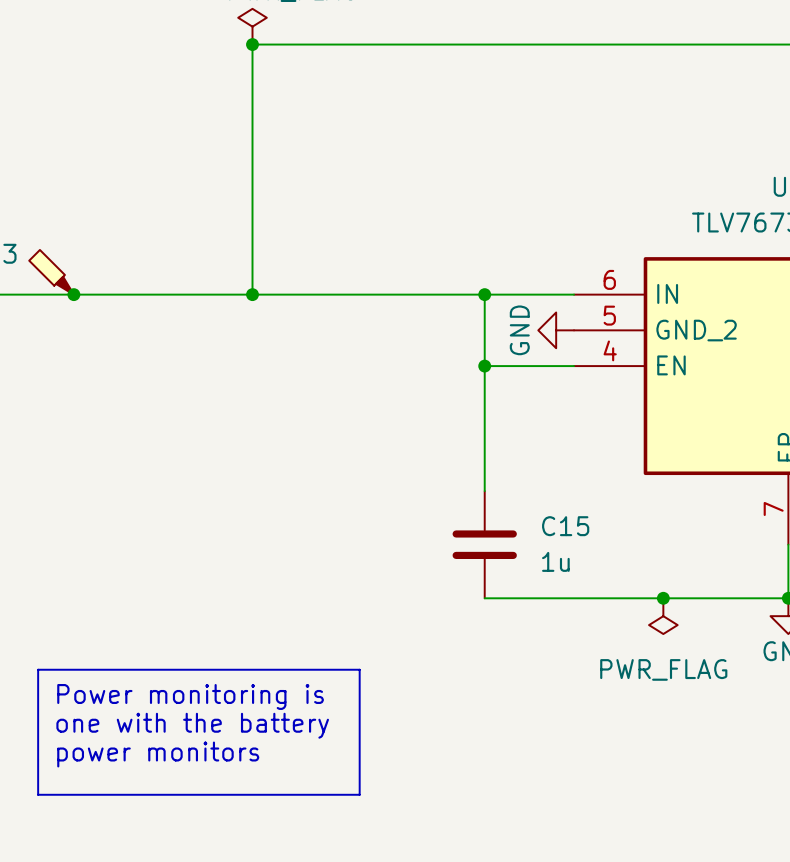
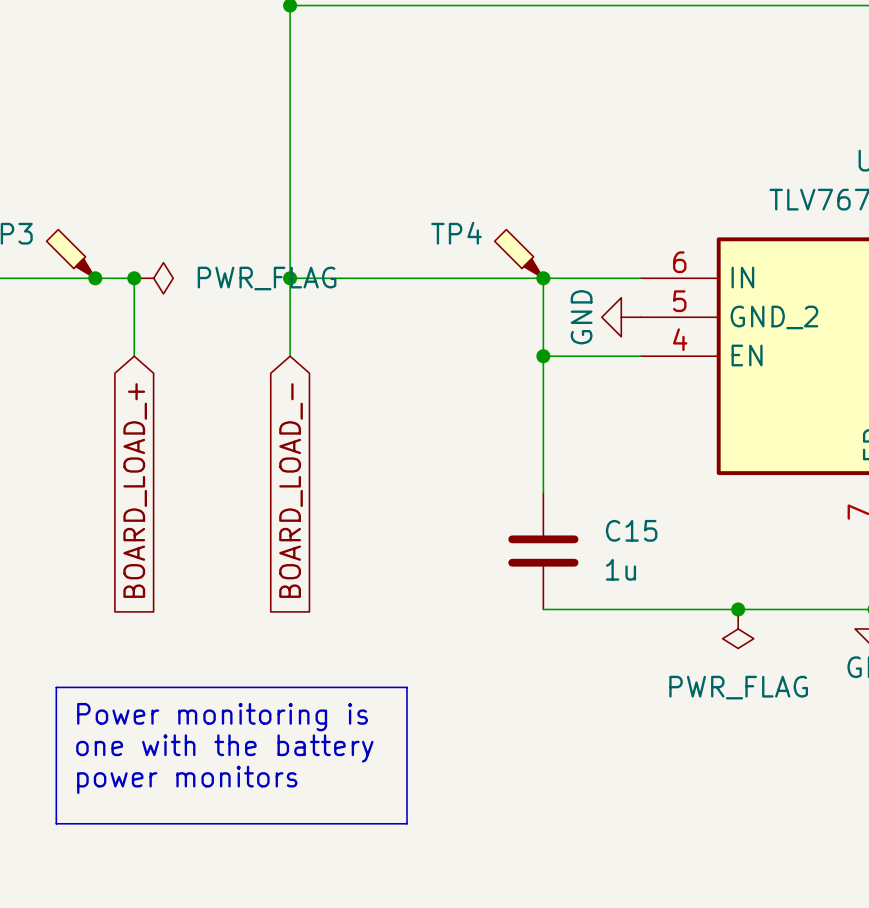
TP4: none -> (519, 253)
wire: (109, 294) (252, 294) -> (134, 278) (134, 356)
junction: none -> (134, 278)
power symbol: none -> PWR_FLAG (153, 278)
wire: none -> (290, 278) (290, 356)
global label: none -> BOARD_LOAD_+ (135, 490)
global label: none -> BOARD_LOAD_- (291, 490)

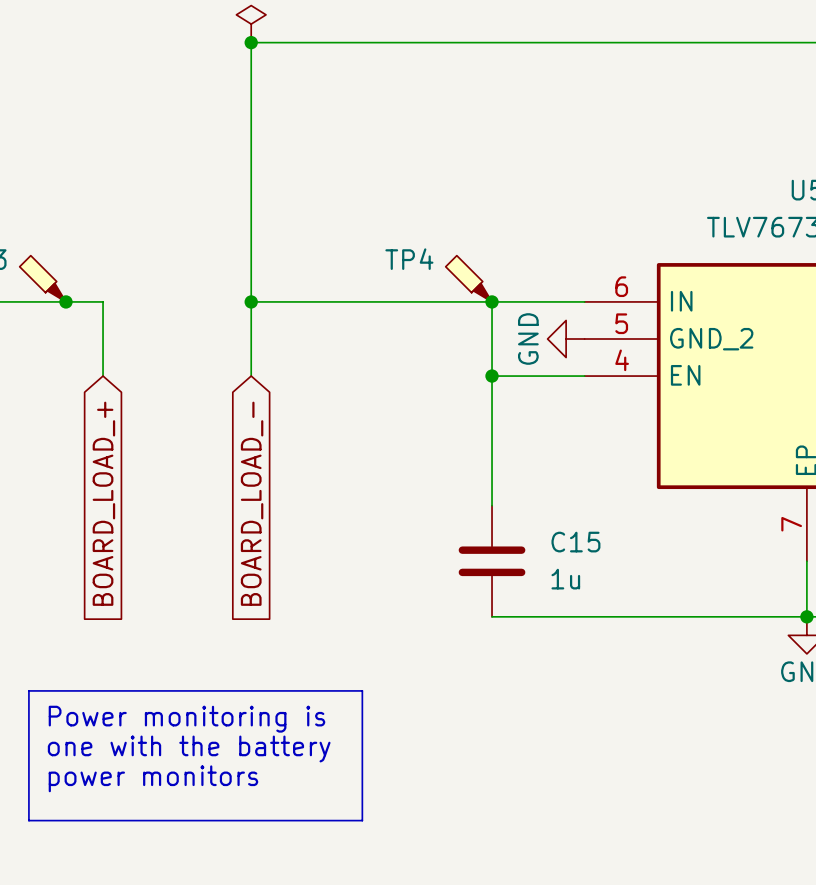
junction: (134, 278) -> none
power symbol: PWR_FLAG (153, 278) -> none
junction: (738, 609) -> none
power symbol: PWR_FLAG (738, 628) -> none

